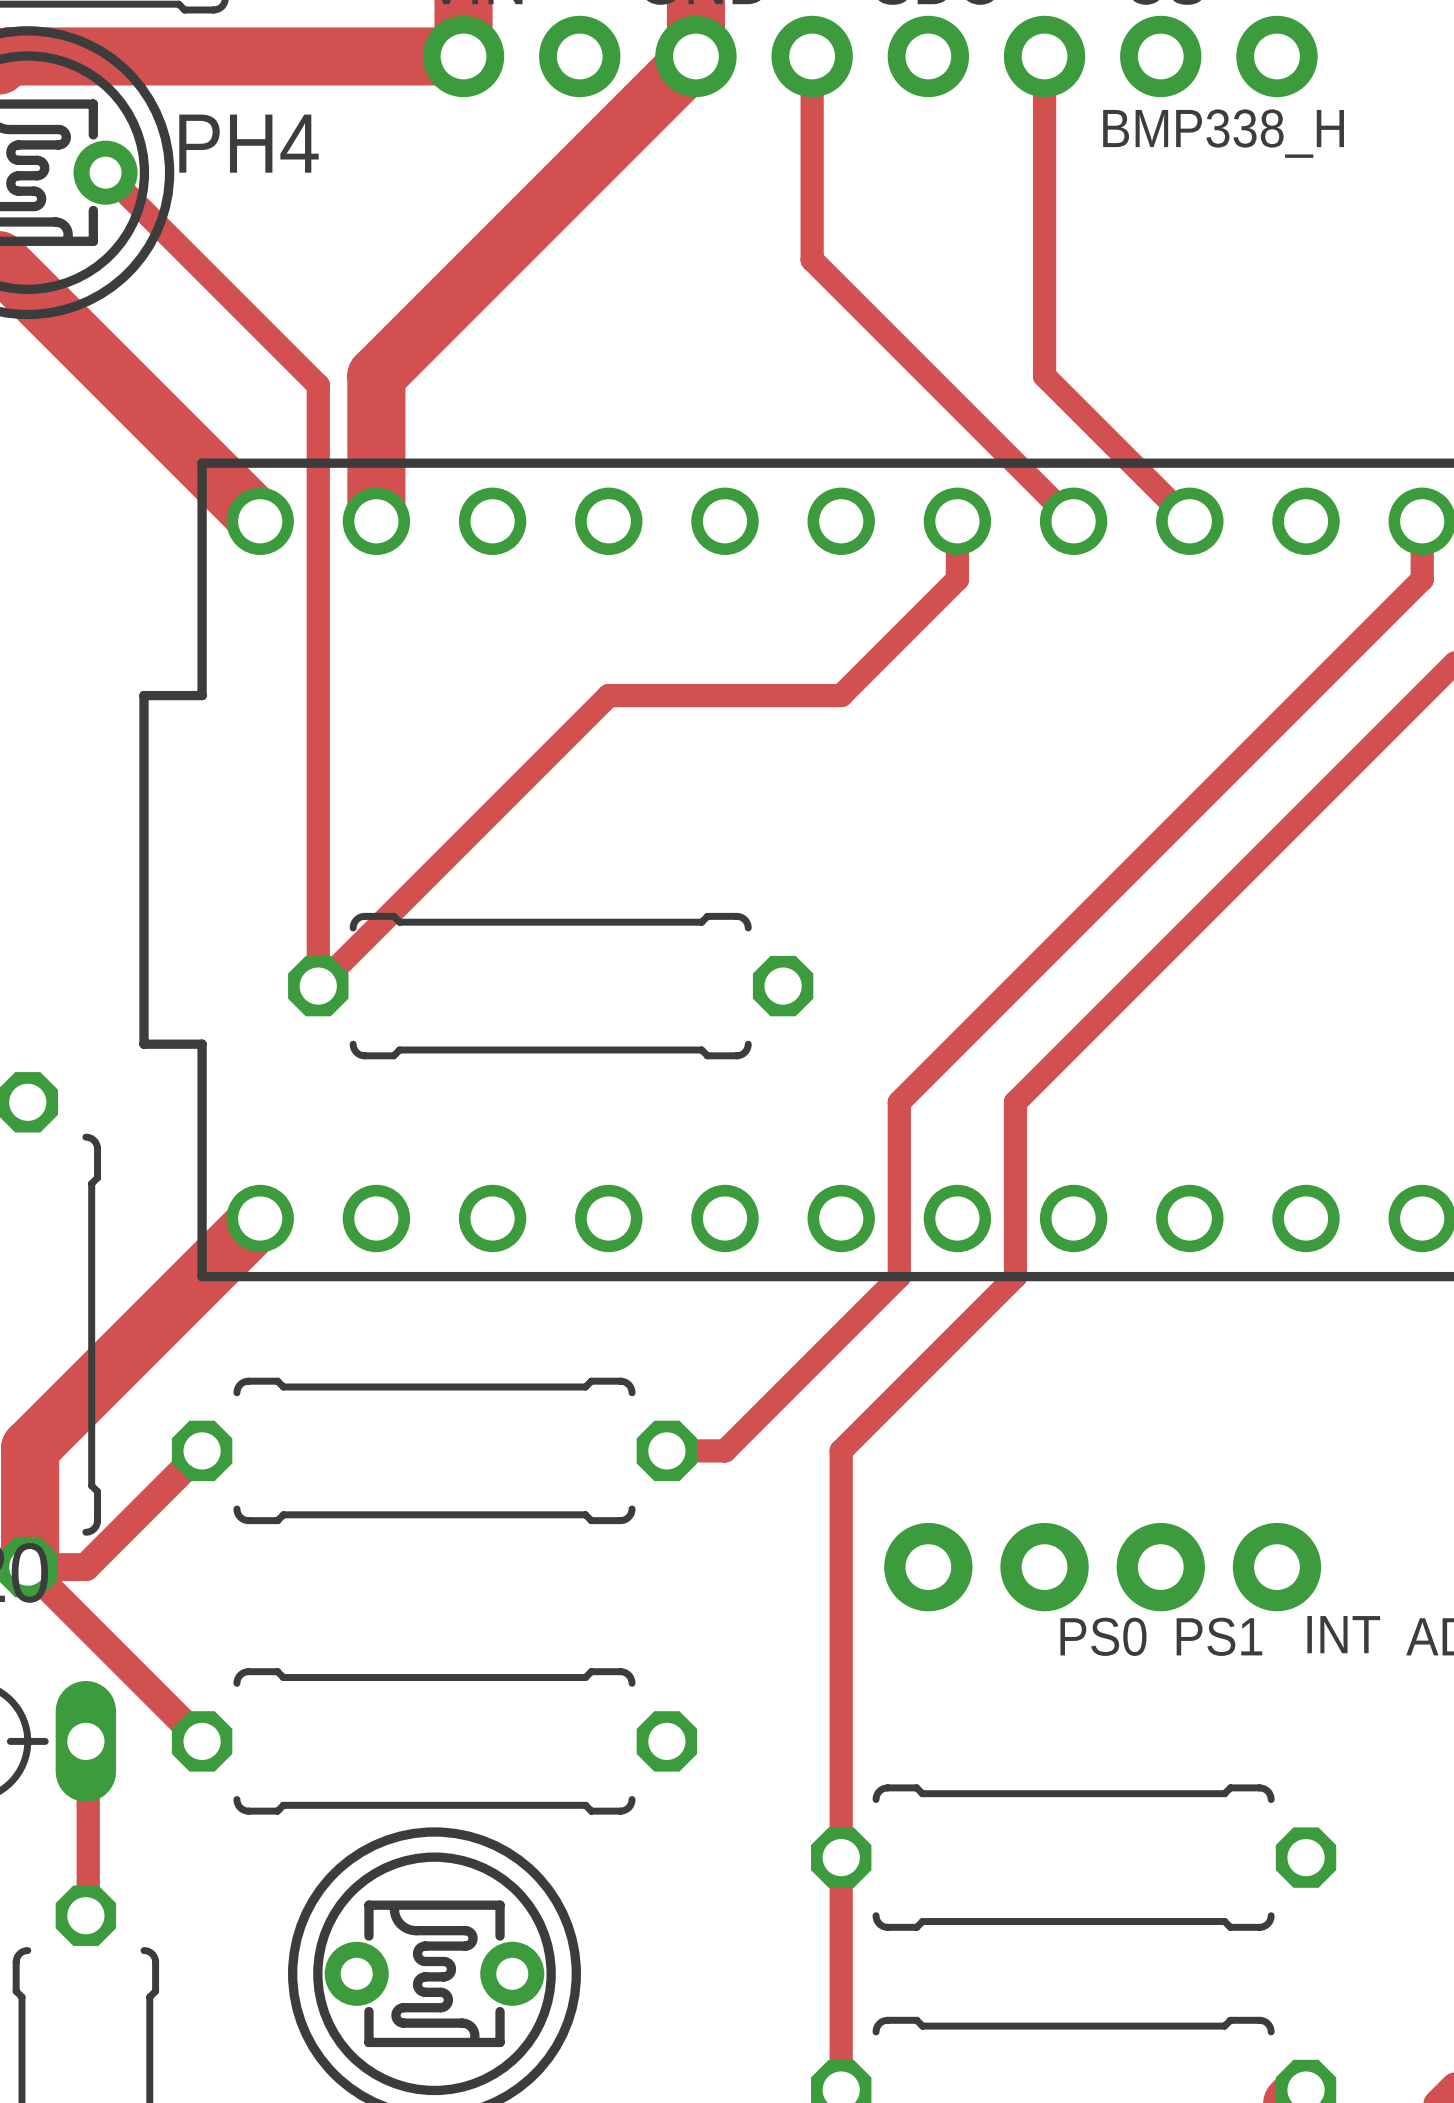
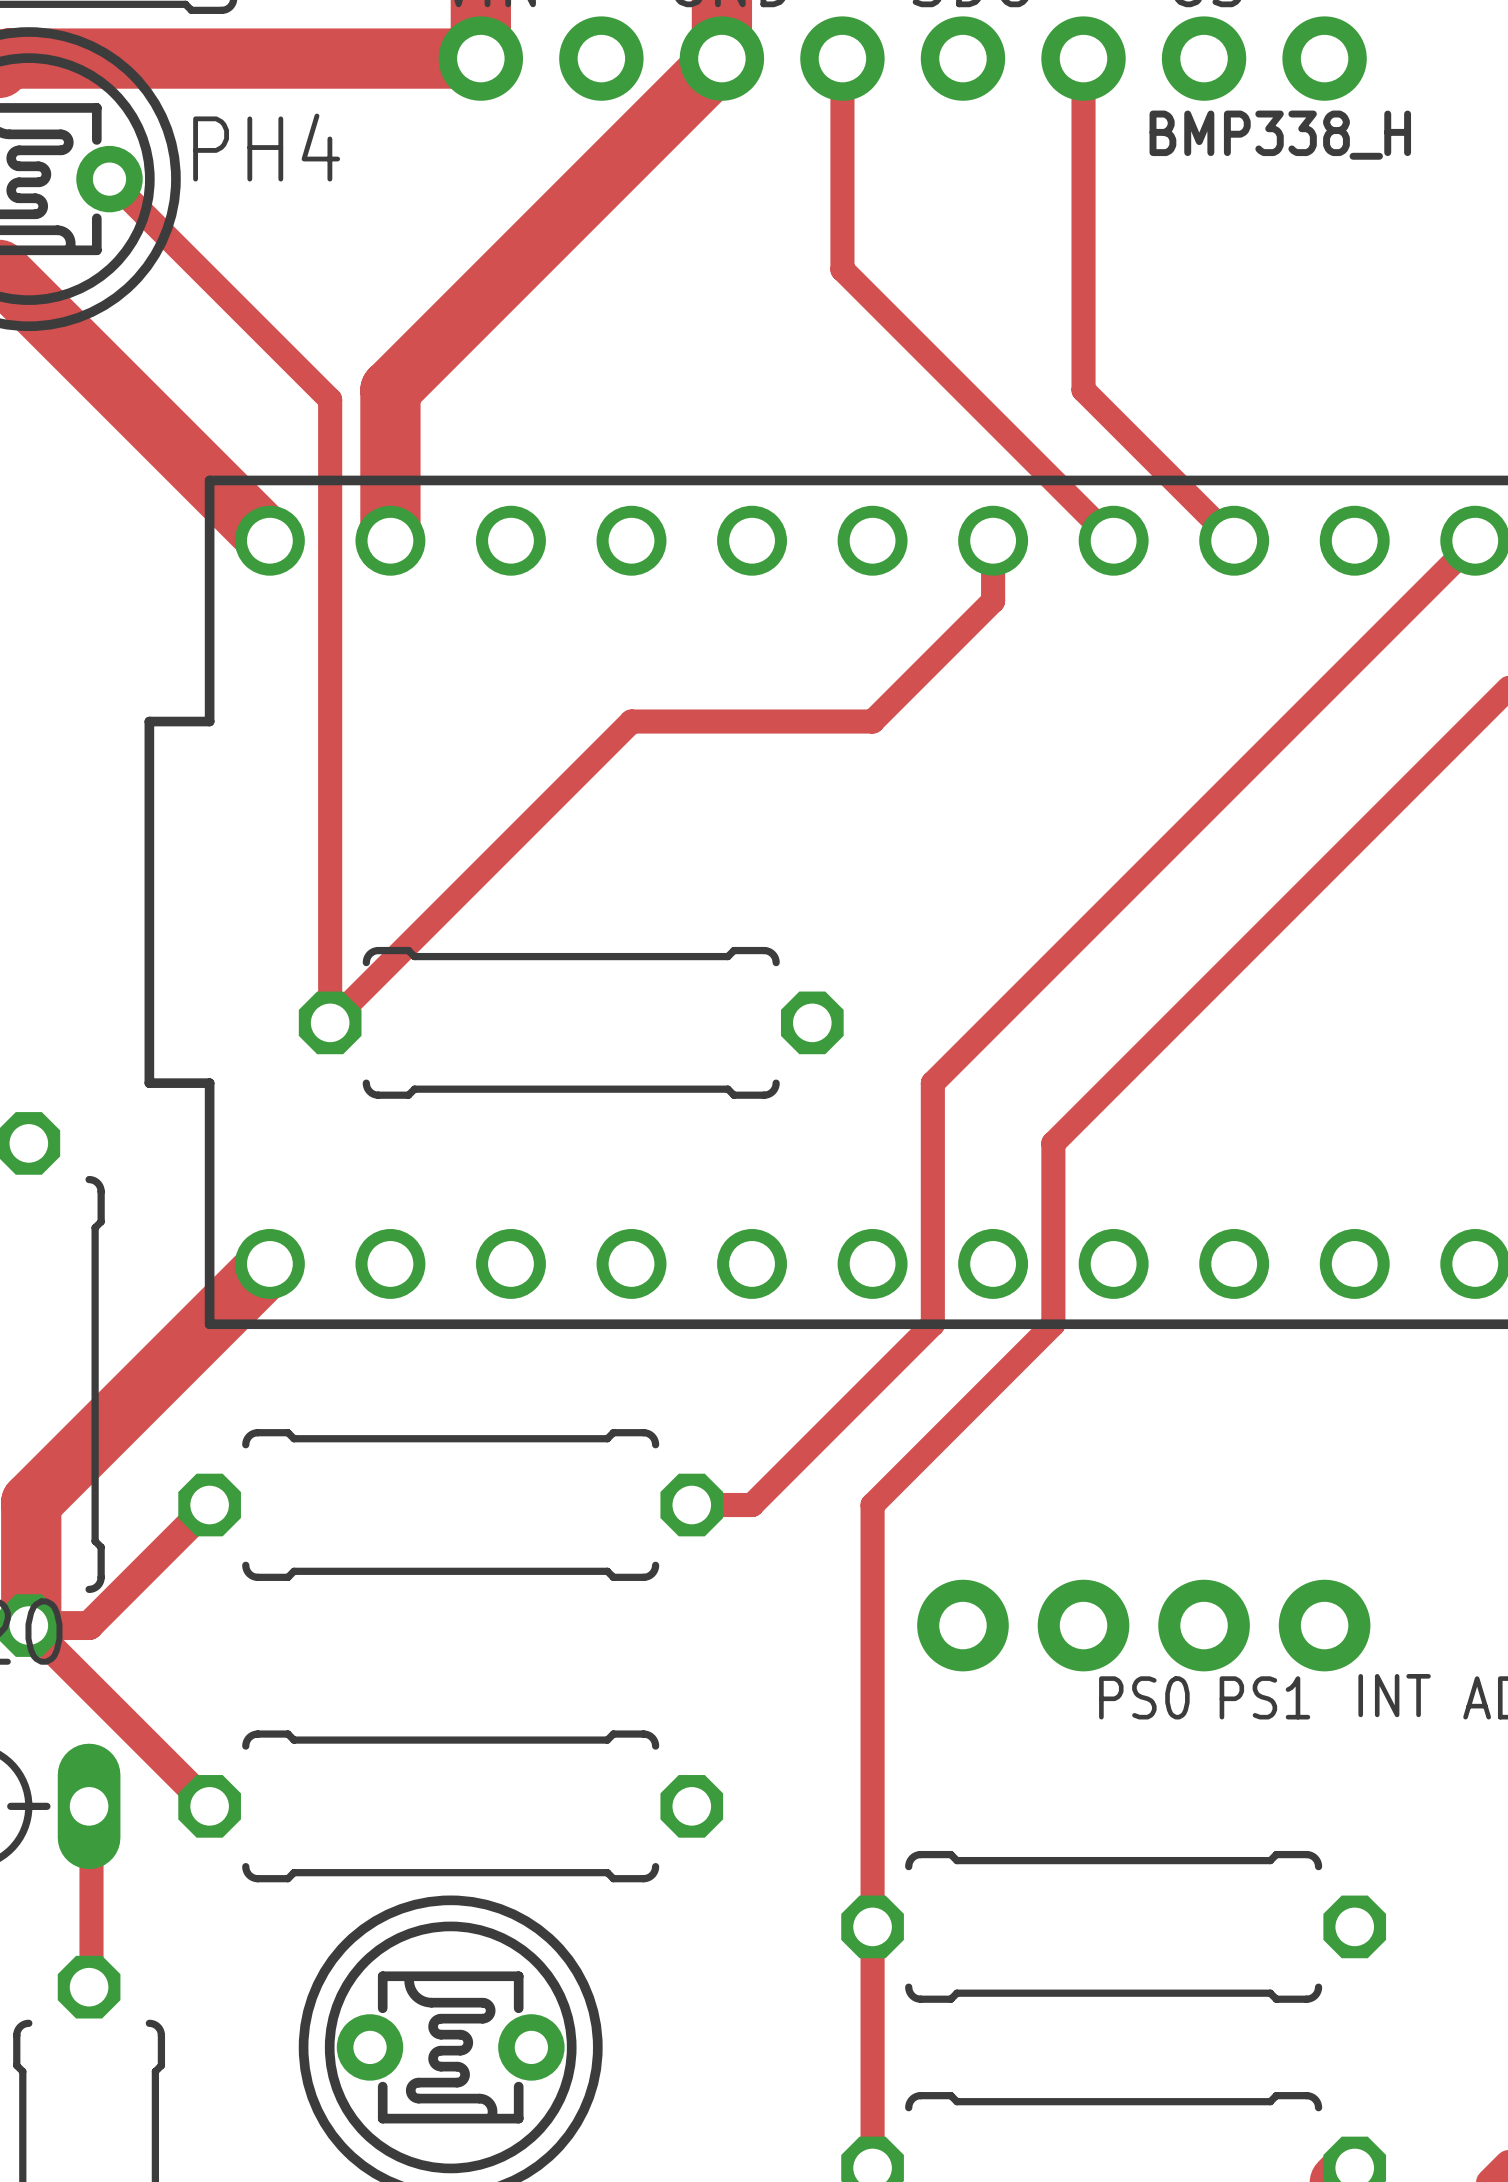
track: (1422, 521) (1422, 579) (899, 1102) -> (1475, 540) (932, 1083) (932, 1143)

